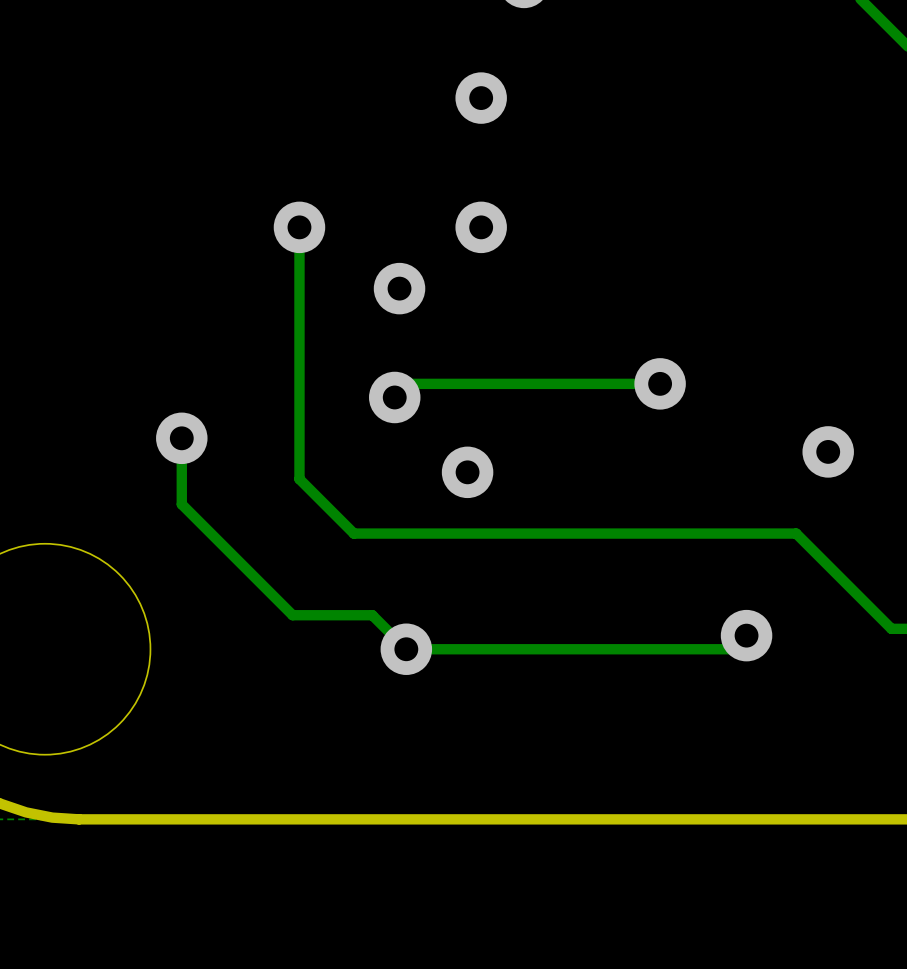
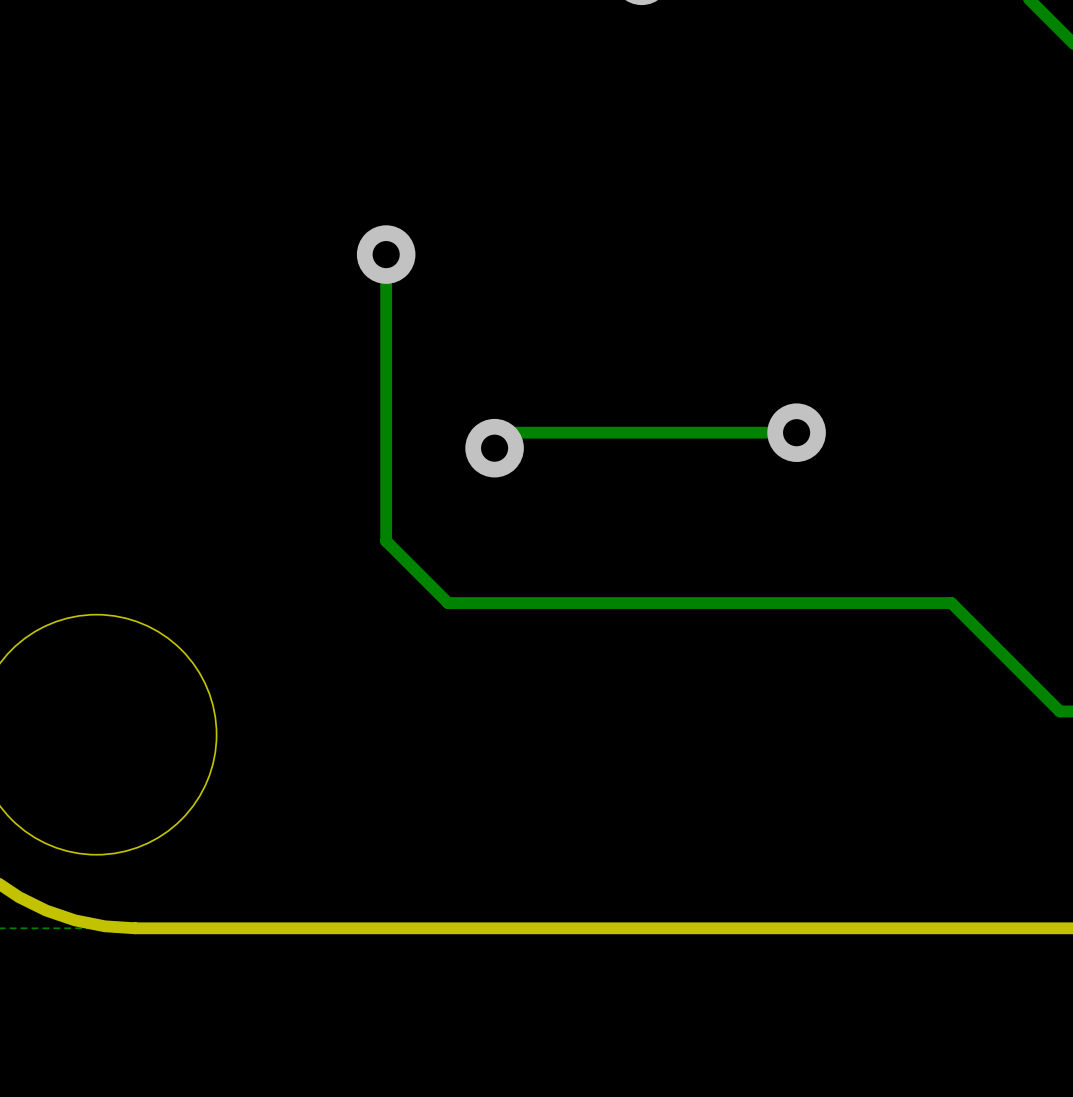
via: (481, 98) -> none
via: (481, 227) -> none
via: (399, 288) -> none
track: (181, 438) (181, 504) (292, 615) (372, 615) (406, 649) (732, 649) (746, 635) -> none
via: (181, 438) -> none
via: (828, 451) -> none
via: (467, 472) -> none
via: (746, 635) -> none
via: (406, 649) -> none

